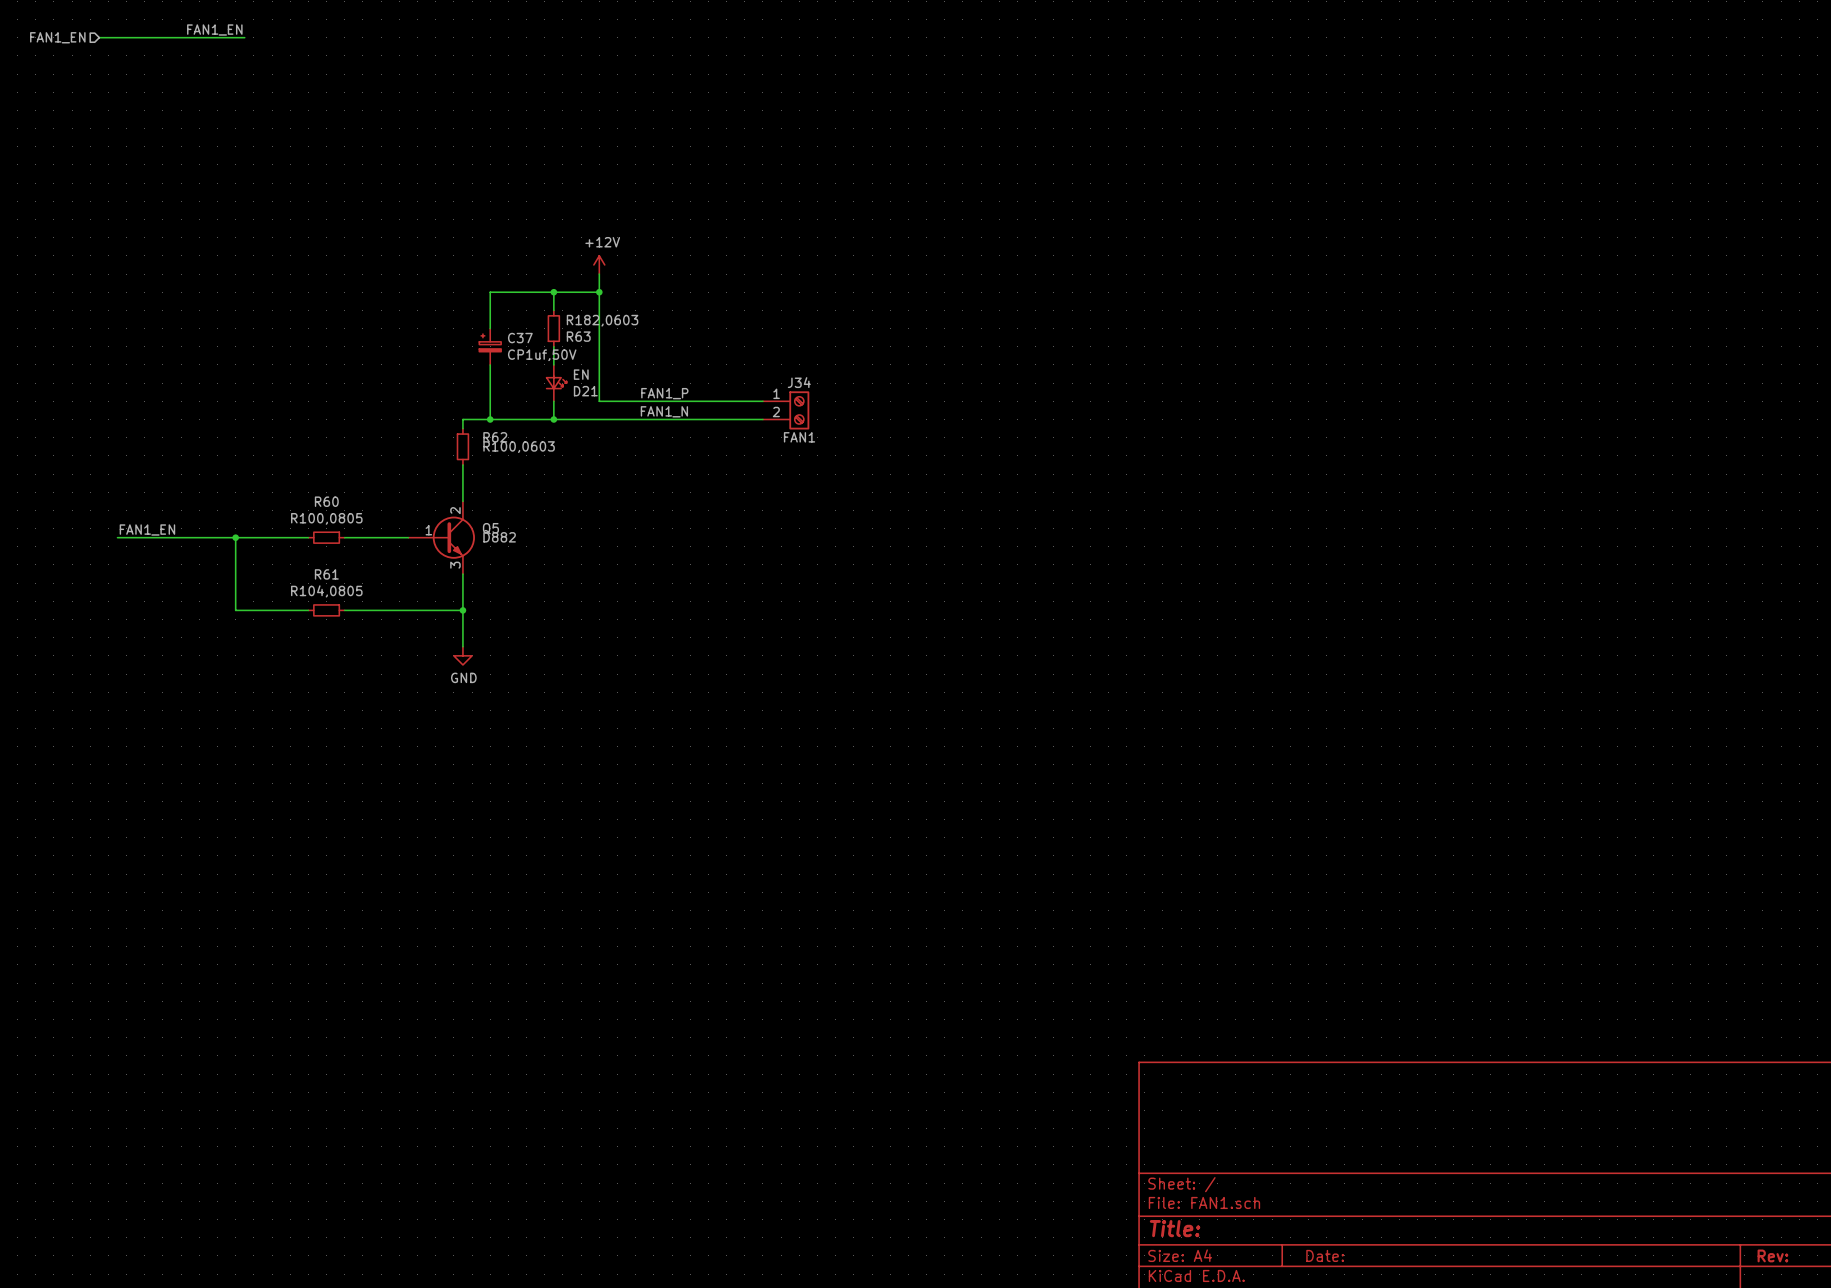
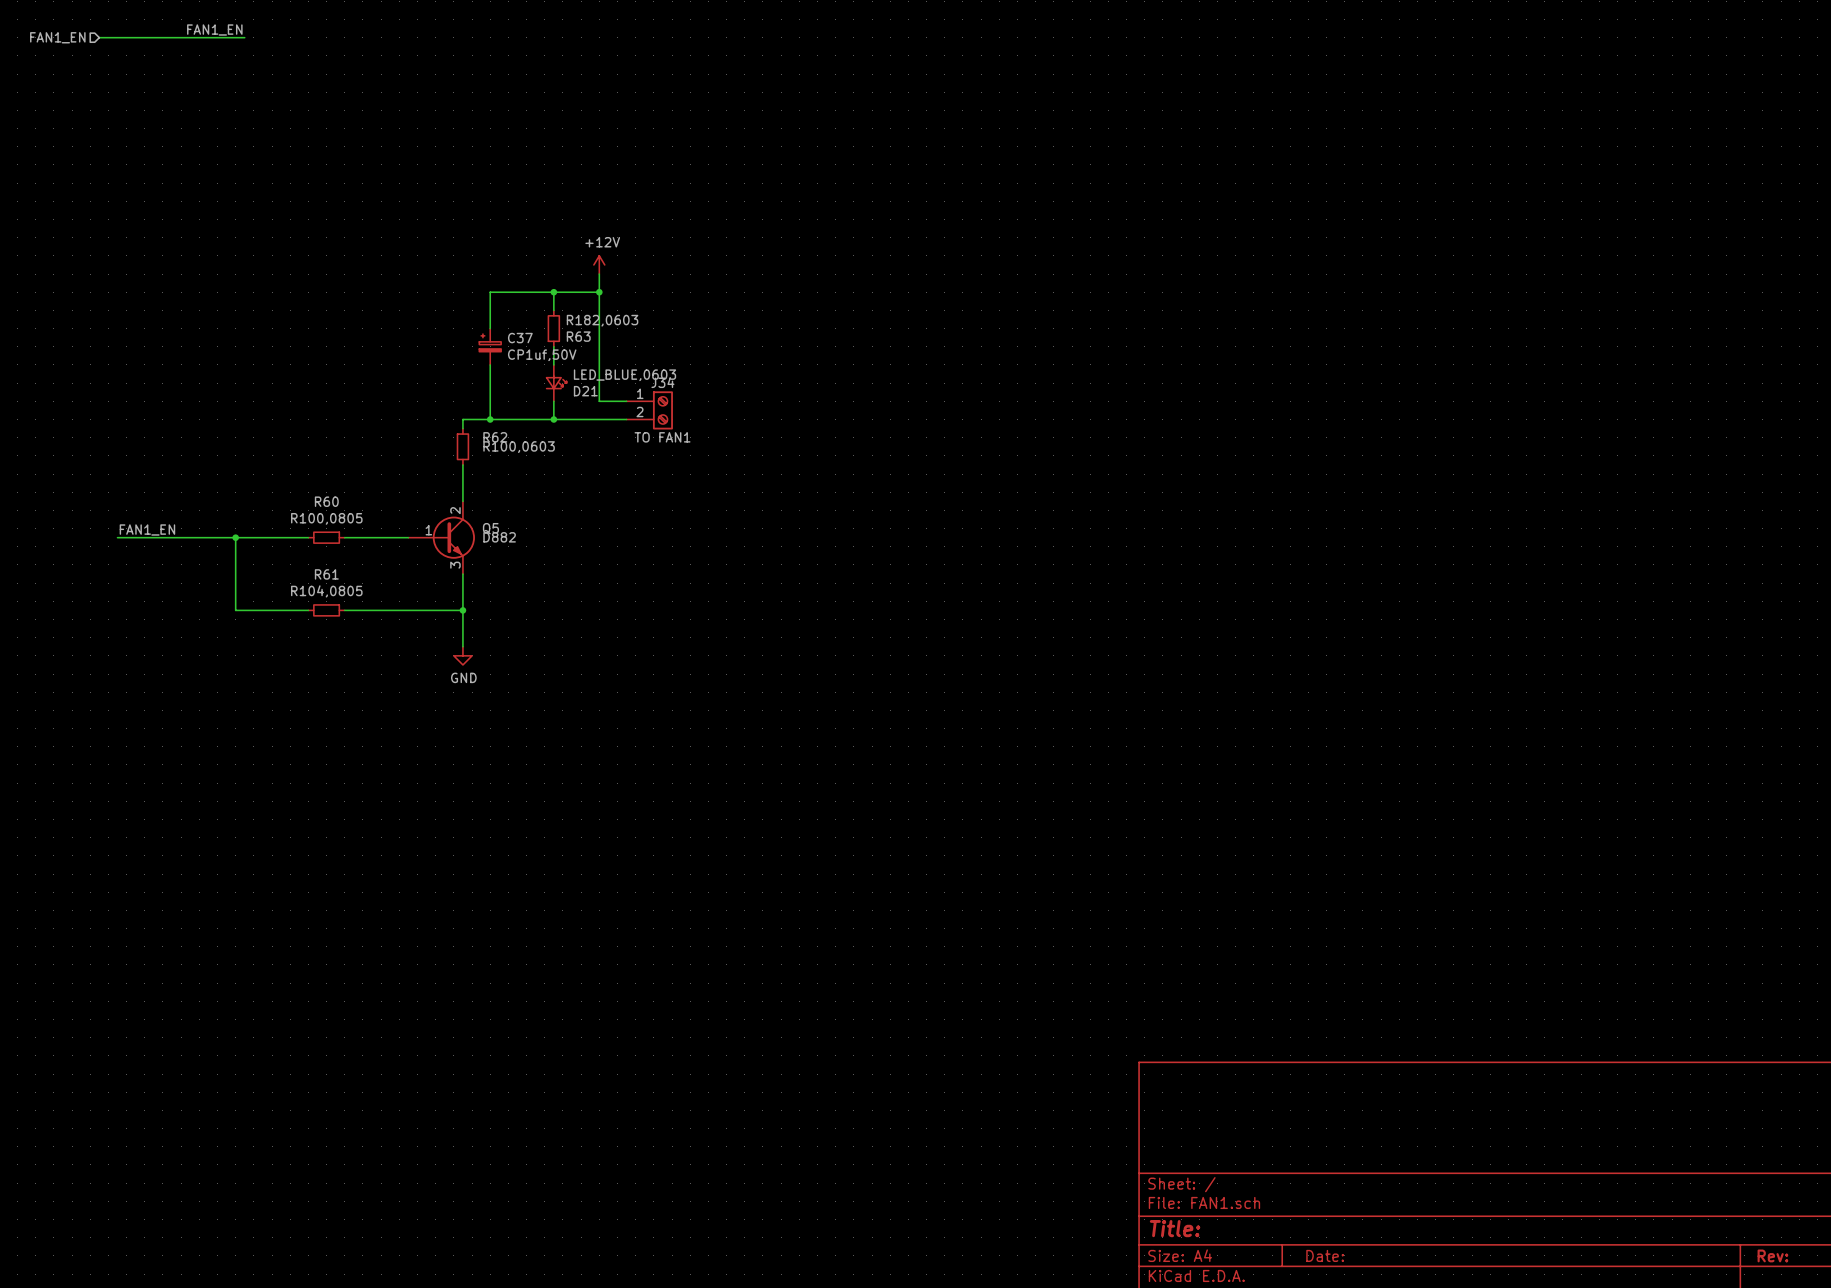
D21 value: EN (581, 374) -> LED_BLUE,0603 (624, 375)
label: FAN1_P (664, 393) -> none
wire: (626, 401) (762, 401) -> none
J34 position: (786, 410) -> (649, 410)
label: FAN1_N (664, 411) -> none
wire: (626, 419) (762, 419) -> none
J34 value: FAN1 (799, 437) -> TO FAN1 (662, 437)

